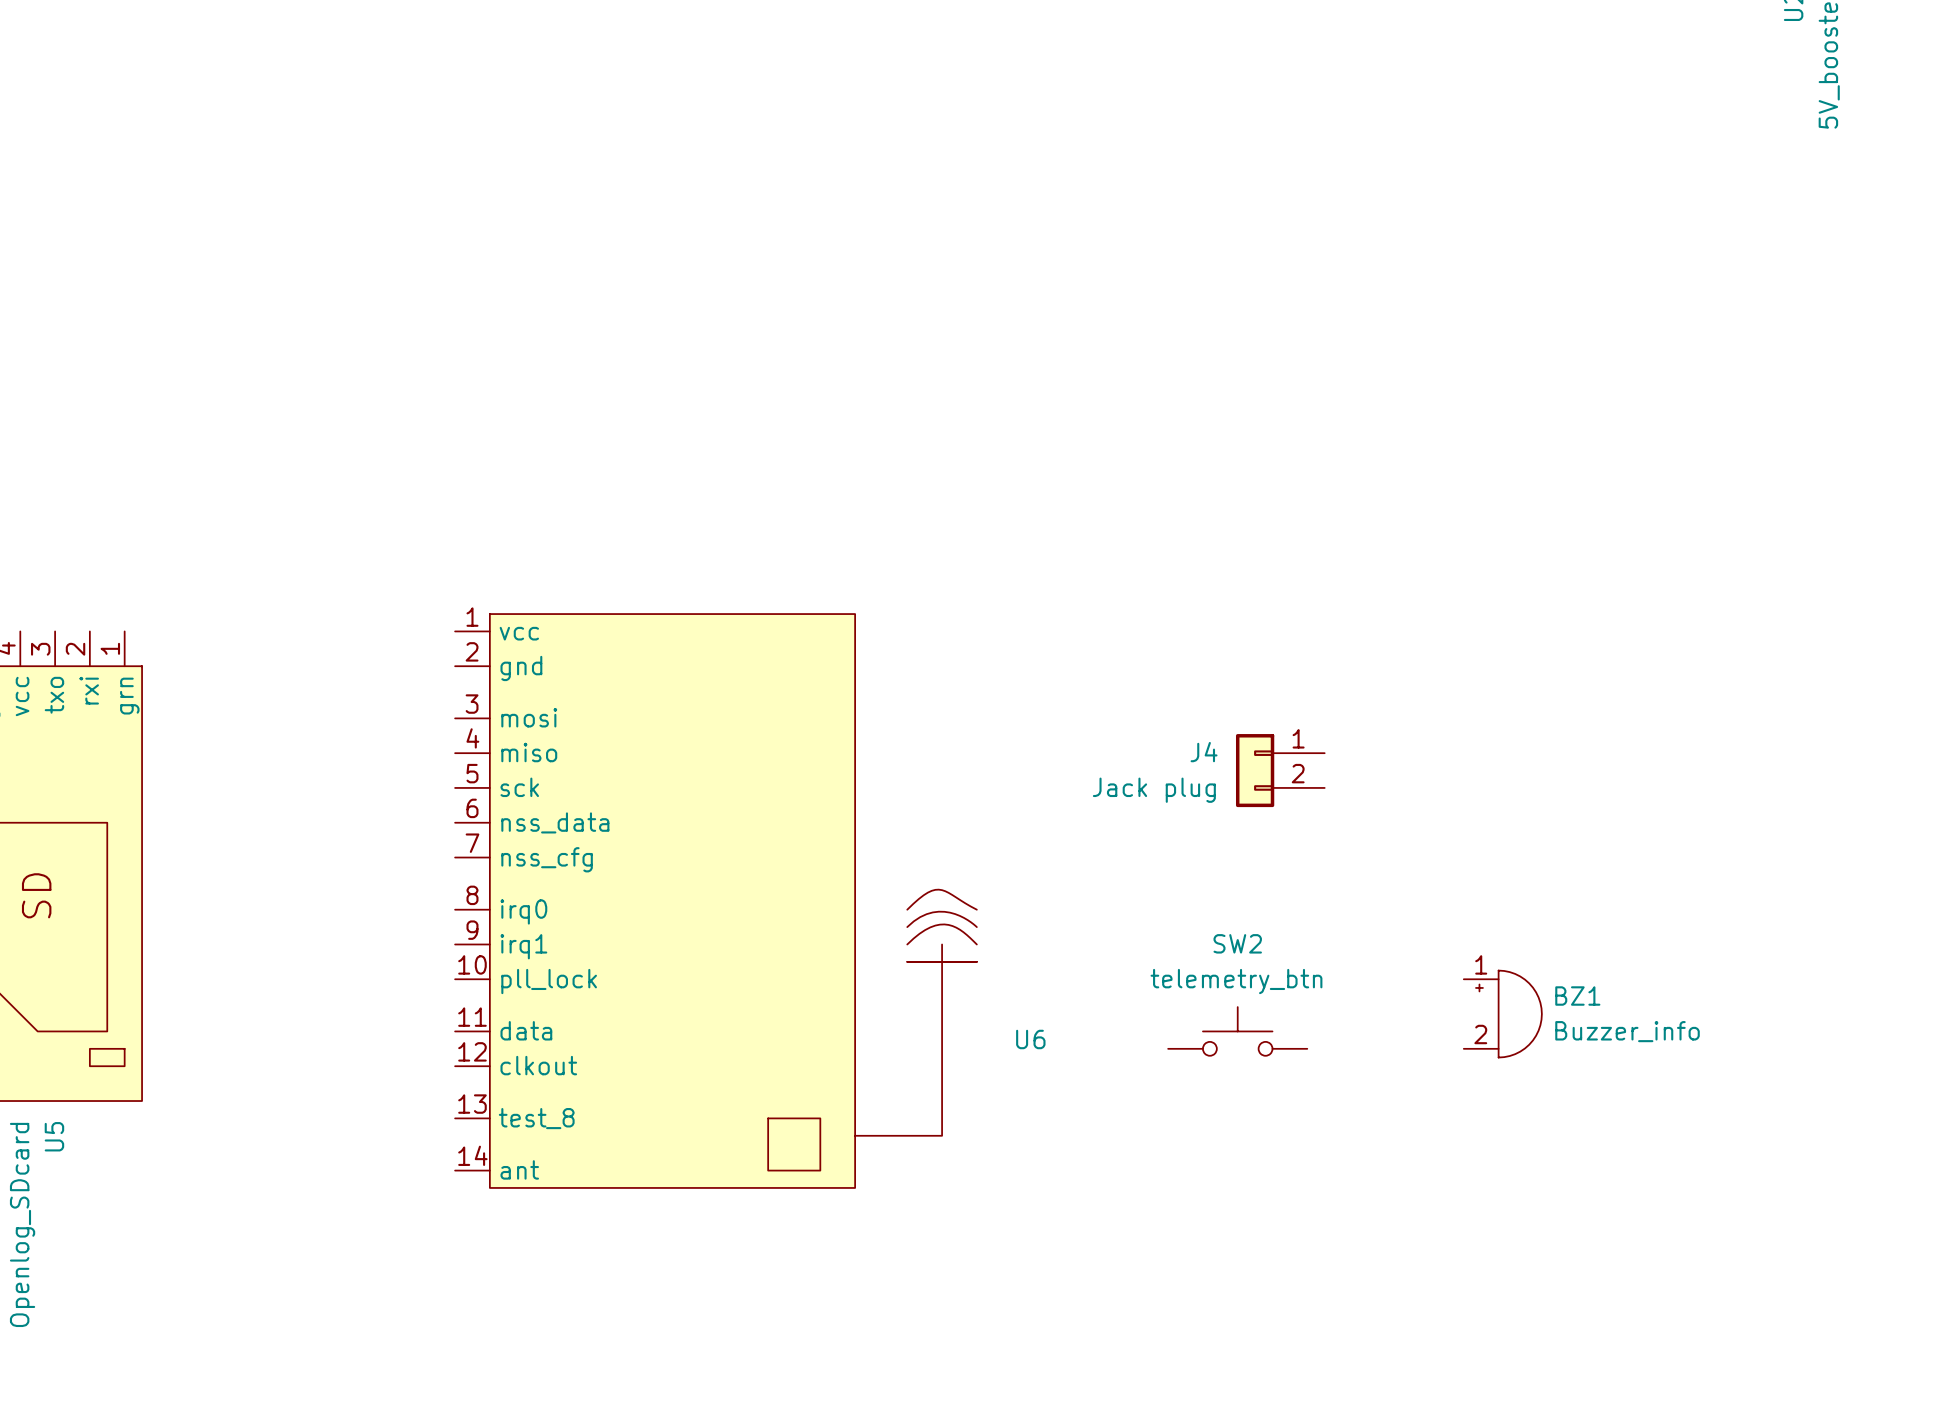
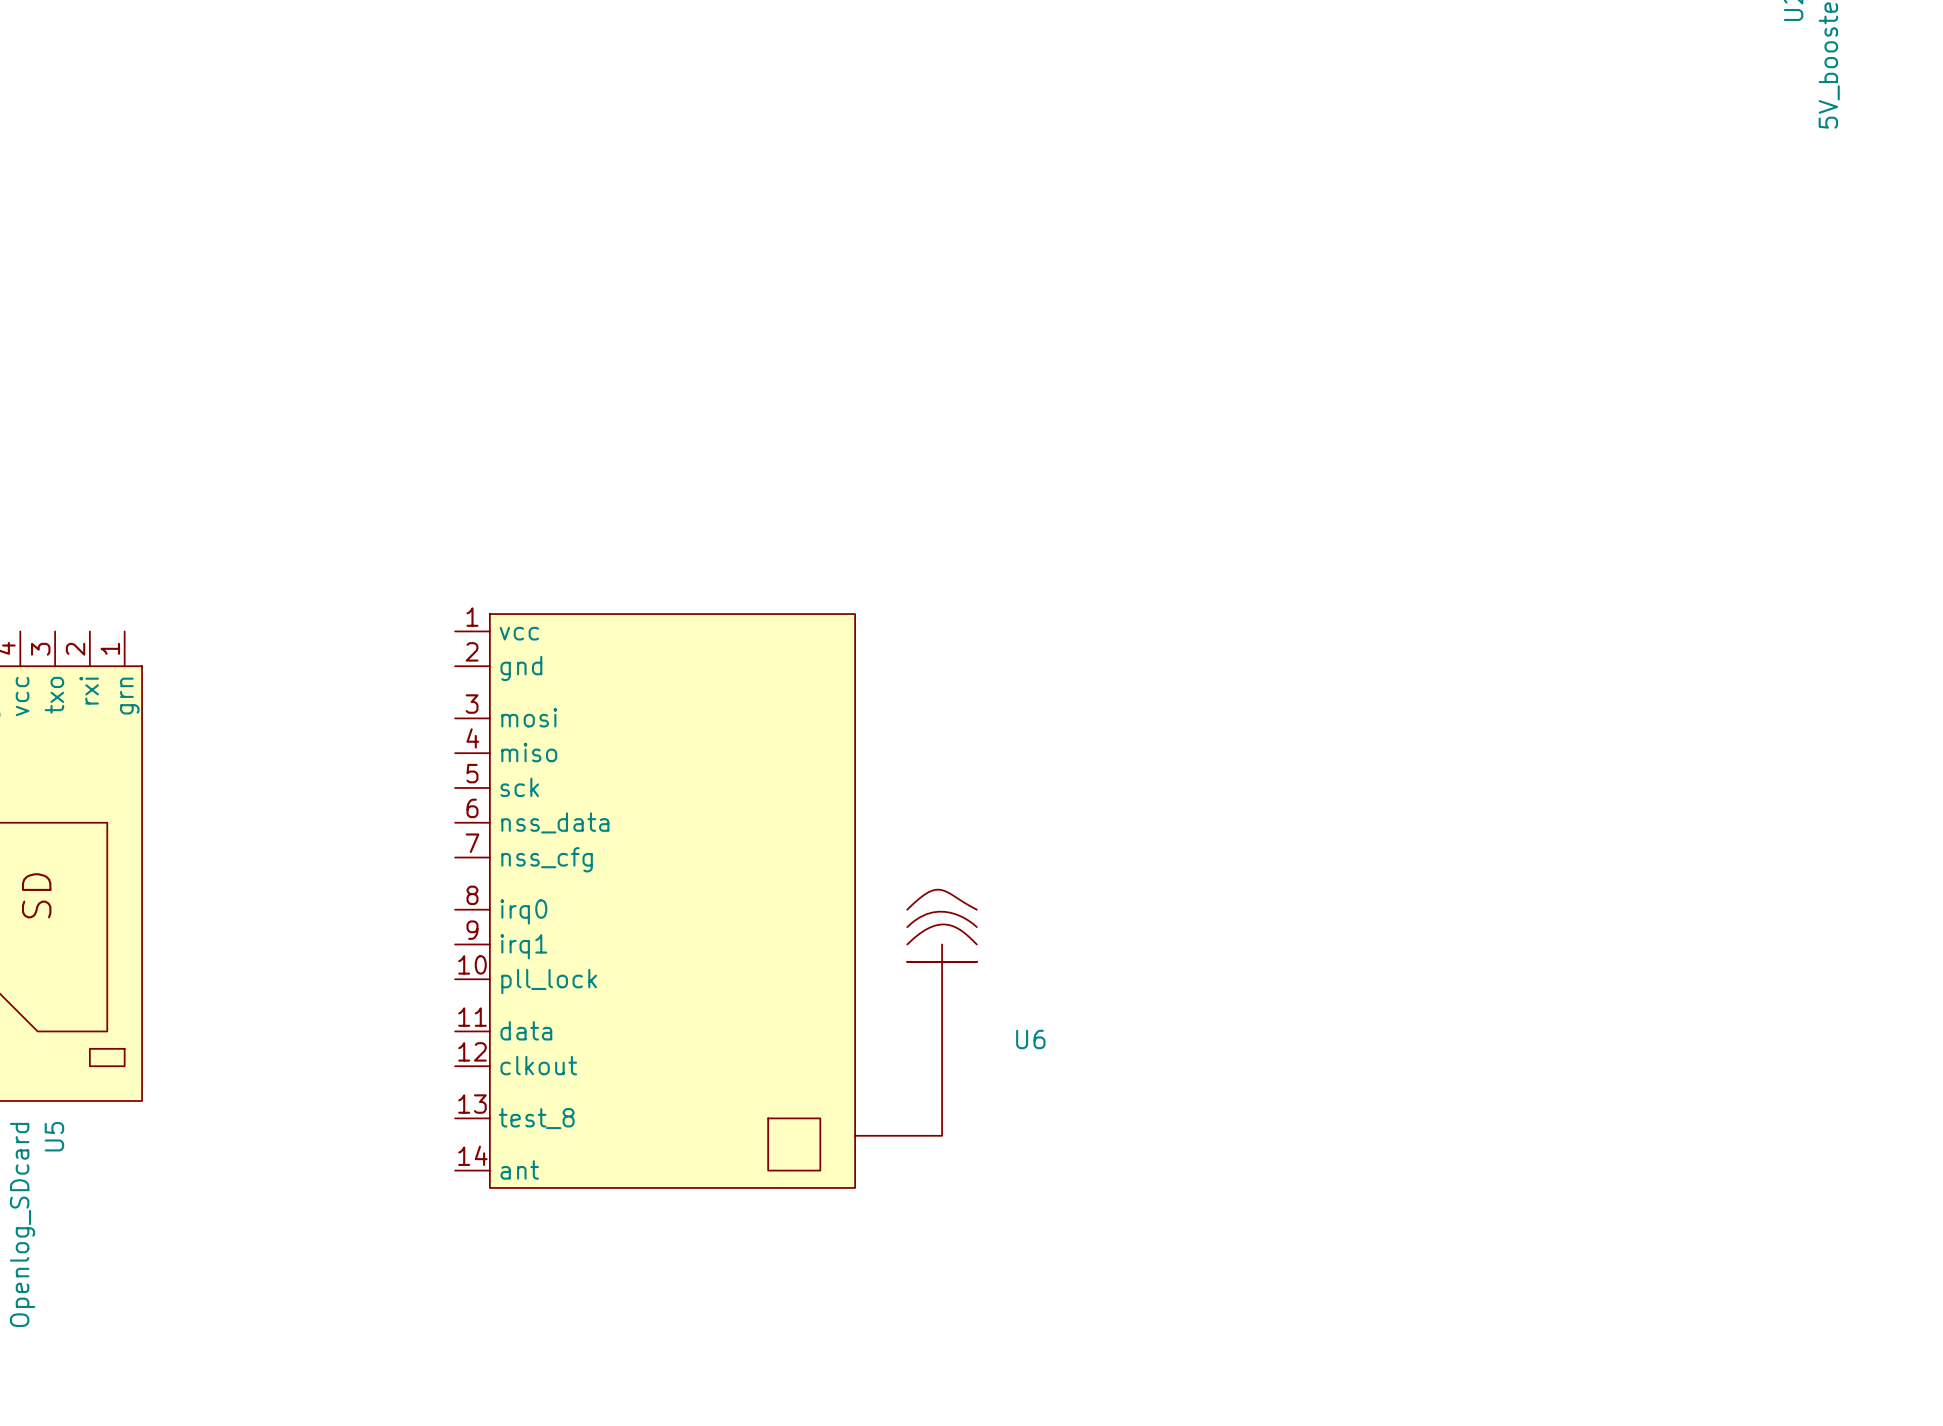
J4: Jack plug (1280, 770) -> none
BZ1: Buzzer_info (1502, 1014) -> none
SW2: telemetry_btn (1237, 1031) -> none

